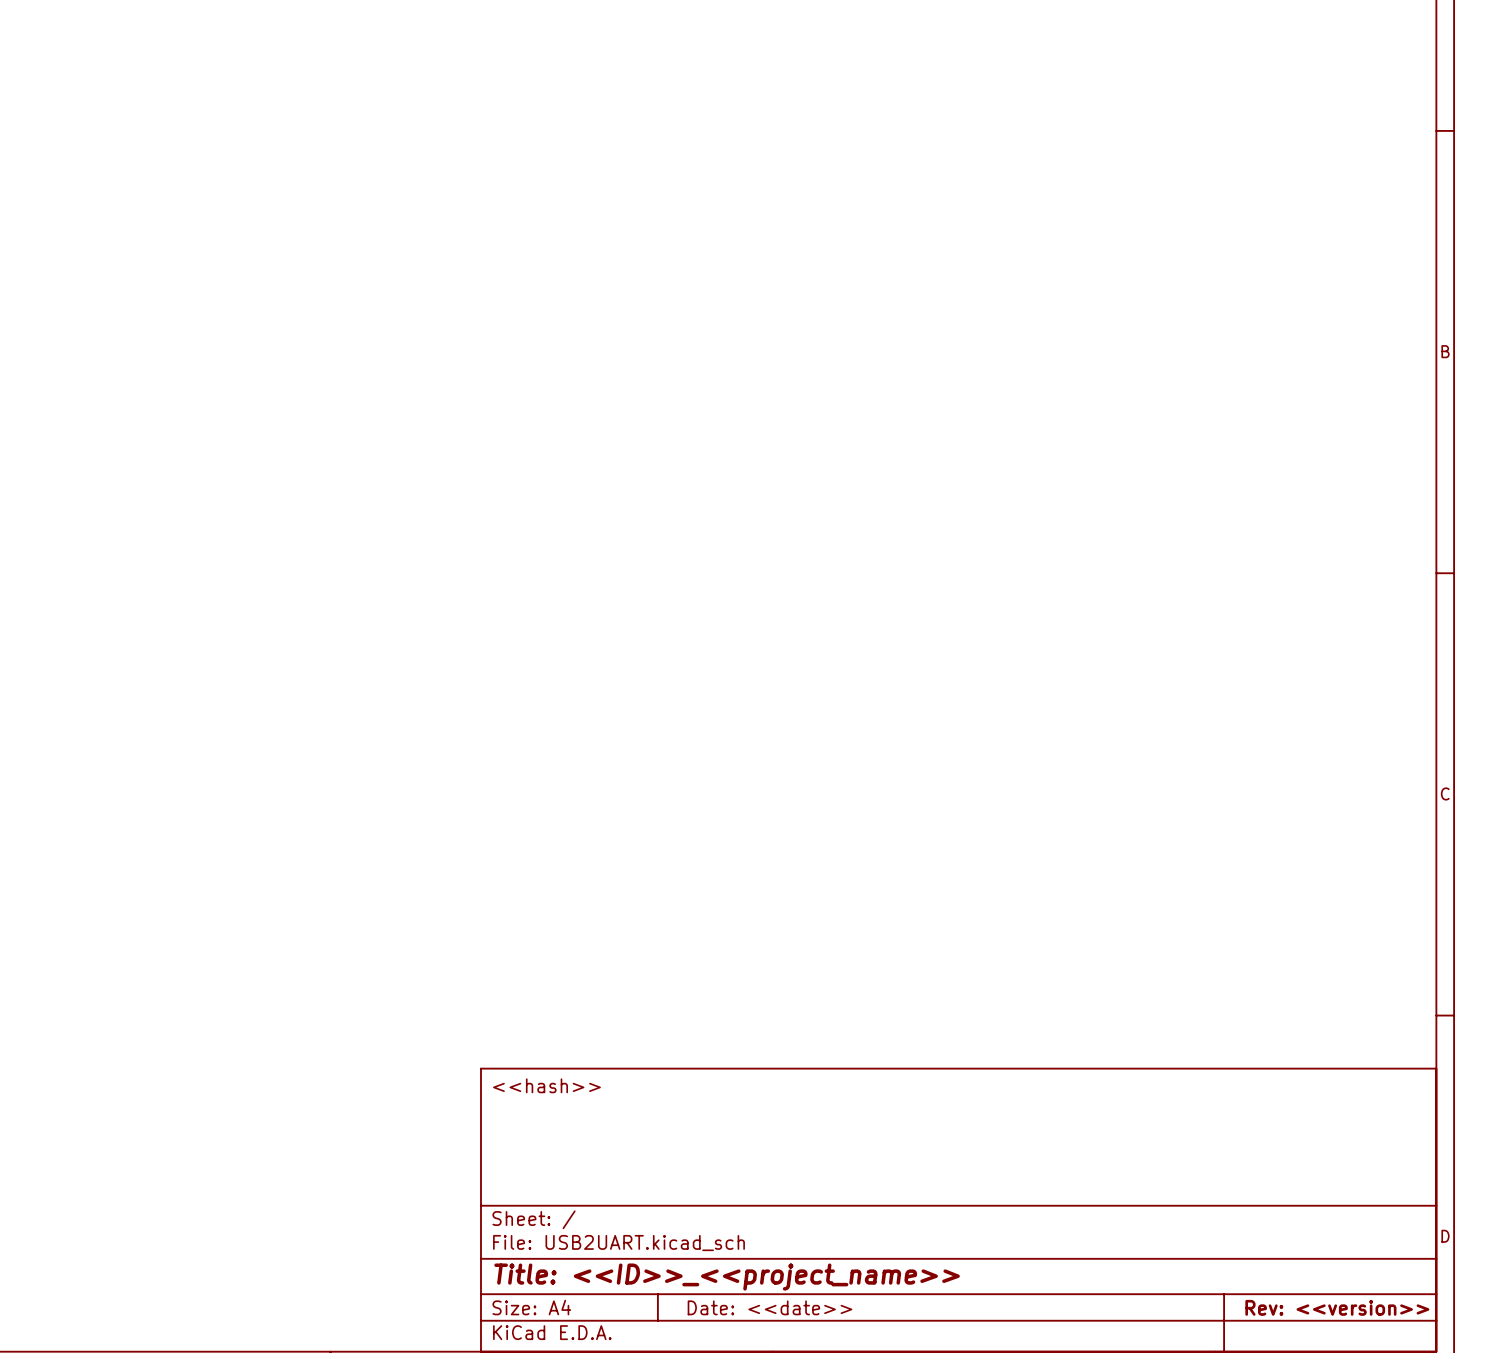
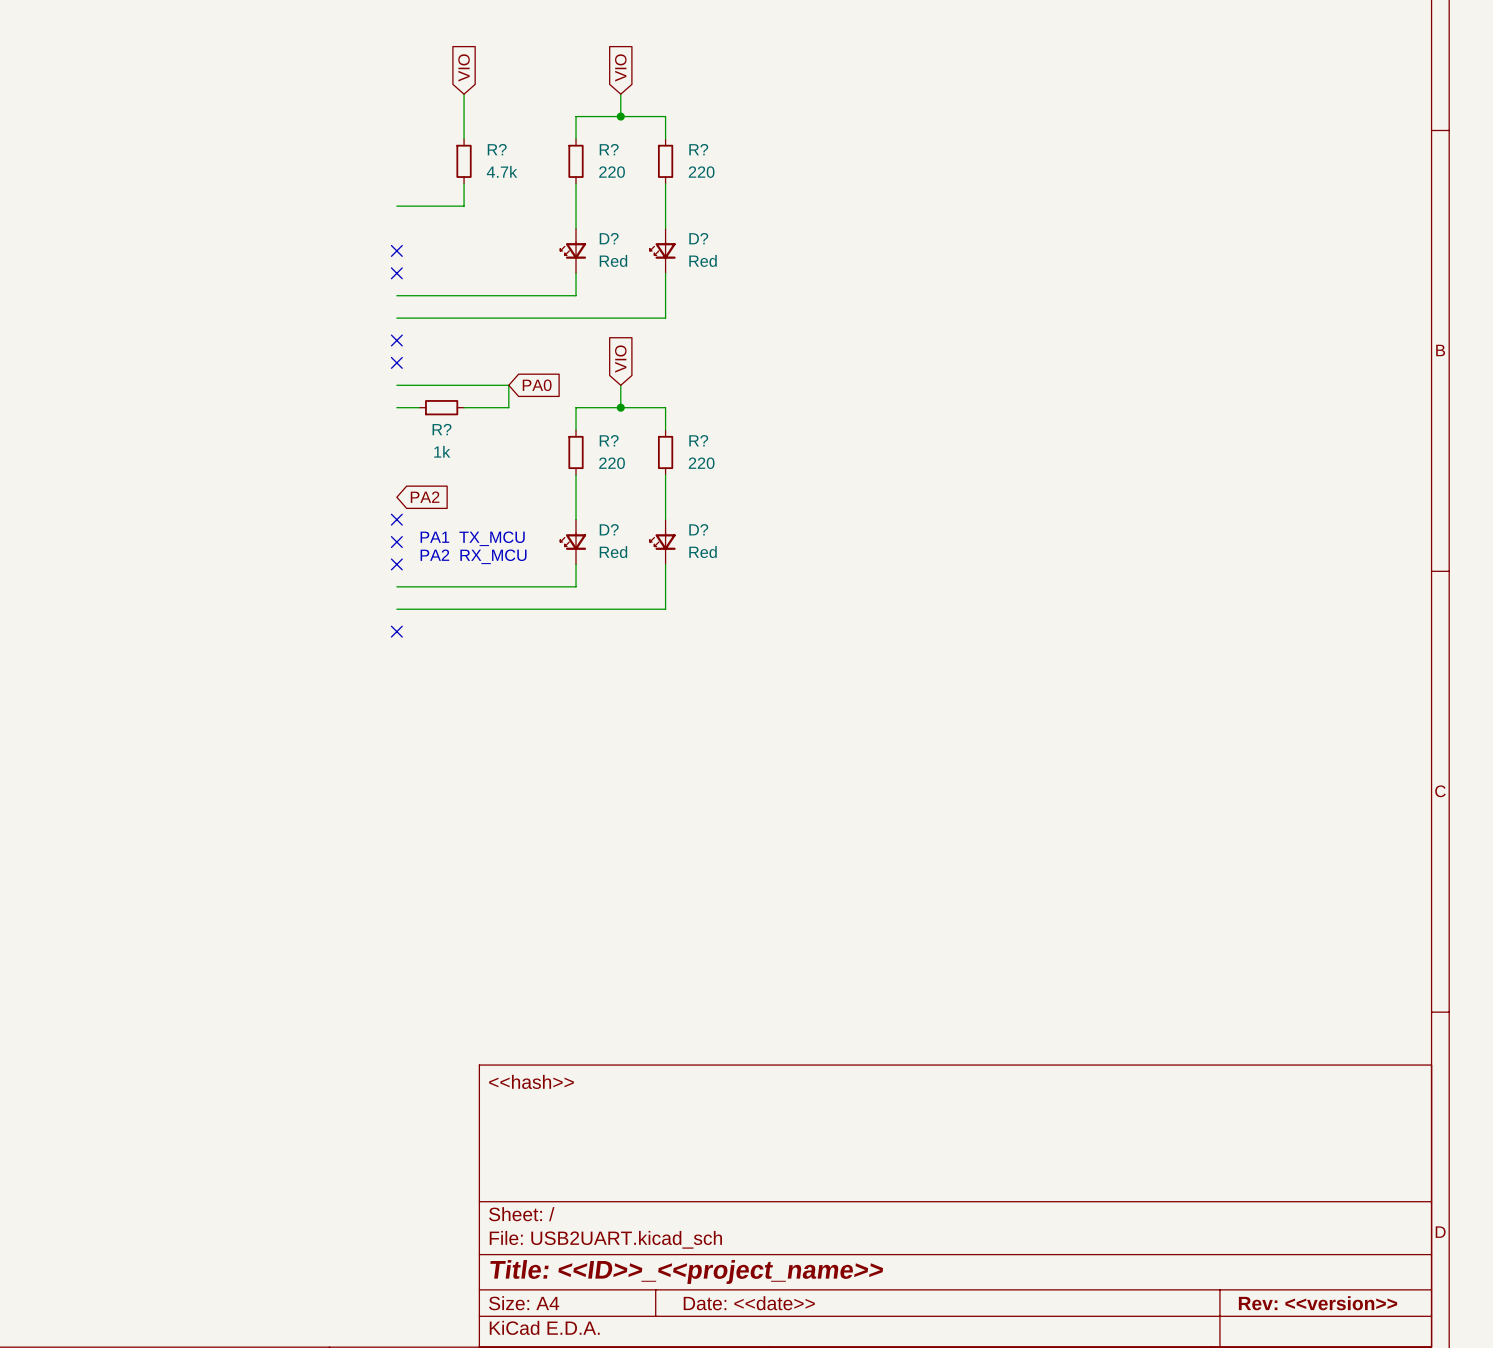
global label: none -> VIO (464, 67)
global label: none -> VIO (620, 67)
wire: none -> (464, 94) (464, 138)
wire: none -> (620, 94) (620, 116)
junction: none -> (620, 116)
wire: none -> (576, 138) (576, 116) (665, 116) (665, 138)
R?: none -> 4.7k (464, 161)
R?: none -> 220 (576, 161)
R?: none -> 220 (665, 161)
wire: none -> (464, 183) (464, 206) (396, 206)
wire: none -> (576, 183) (576, 228)
wire: none -> (665, 183) (665, 228)
no-connect mark: none -> (396, 250)
D?: none -> Red (573, 250)
D?: none -> Red (662, 250)
no-connect mark: none -> (396, 273)
wire: none -> (576, 273) (576, 295) (396, 295)
wire: none -> (665, 273) (665, 318) (396, 318)
no-connect mark: none -> (396, 340)
global label: none -> VIO (620, 359)
no-connect mark: none -> (396, 362)
wire: none -> (396, 385) (508, 385) (508, 407) (464, 407)
global label: none -> PA0 (537, 385)
wire: none -> (620, 385) (620, 407)
wire: none -> (396, 407) (419, 407)
R?: none -> 1k (441, 407)
junction: none -> (620, 407)
wire: none -> (576, 430) (576, 407) (665, 407) (665, 430)
R?: none -> 220 (576, 452)
R?: none -> 220 (665, 452)
wire: none -> (576, 474) (576, 519)
wire: none -> (665, 474) (665, 519)
global label: none -> PA2 (425, 497)
no-connect mark: none -> (396, 519)
text: none -> PA1 TX_MCU (472, 538)
no-connect mark: none -> (396, 542)
D?: none -> Red (573, 542)
D?: none -> Red (662, 542)
text: none -> PA2 RX_MCU (473, 556)
no-connect mark: none -> (396, 564)
wire: none -> (576, 564) (576, 586) (396, 586)
wire: none -> (665, 564) (665, 609) (396, 609)
no-connect mark: none -> (396, 631)

